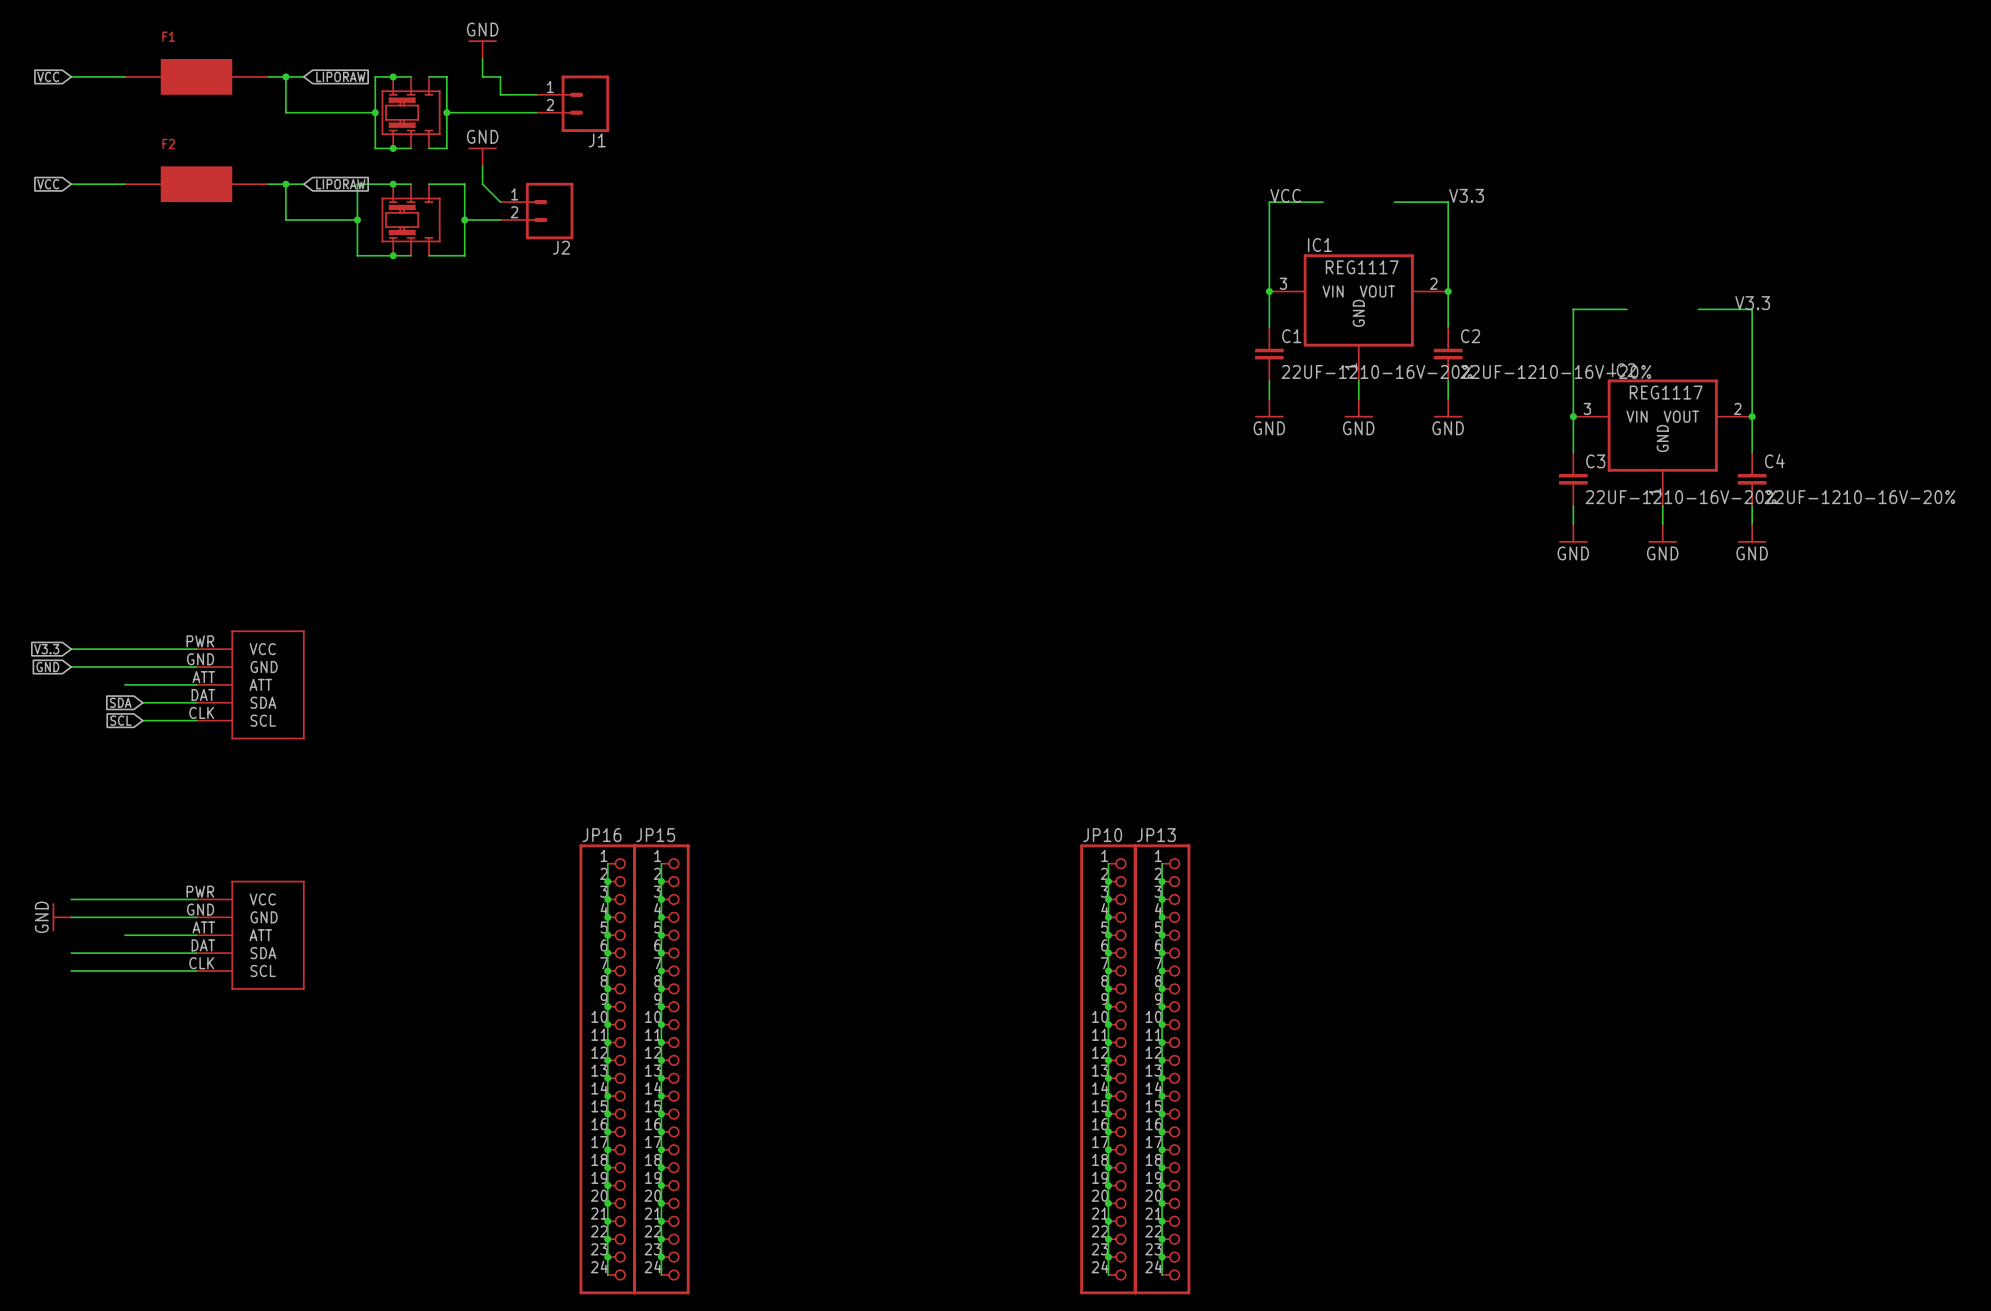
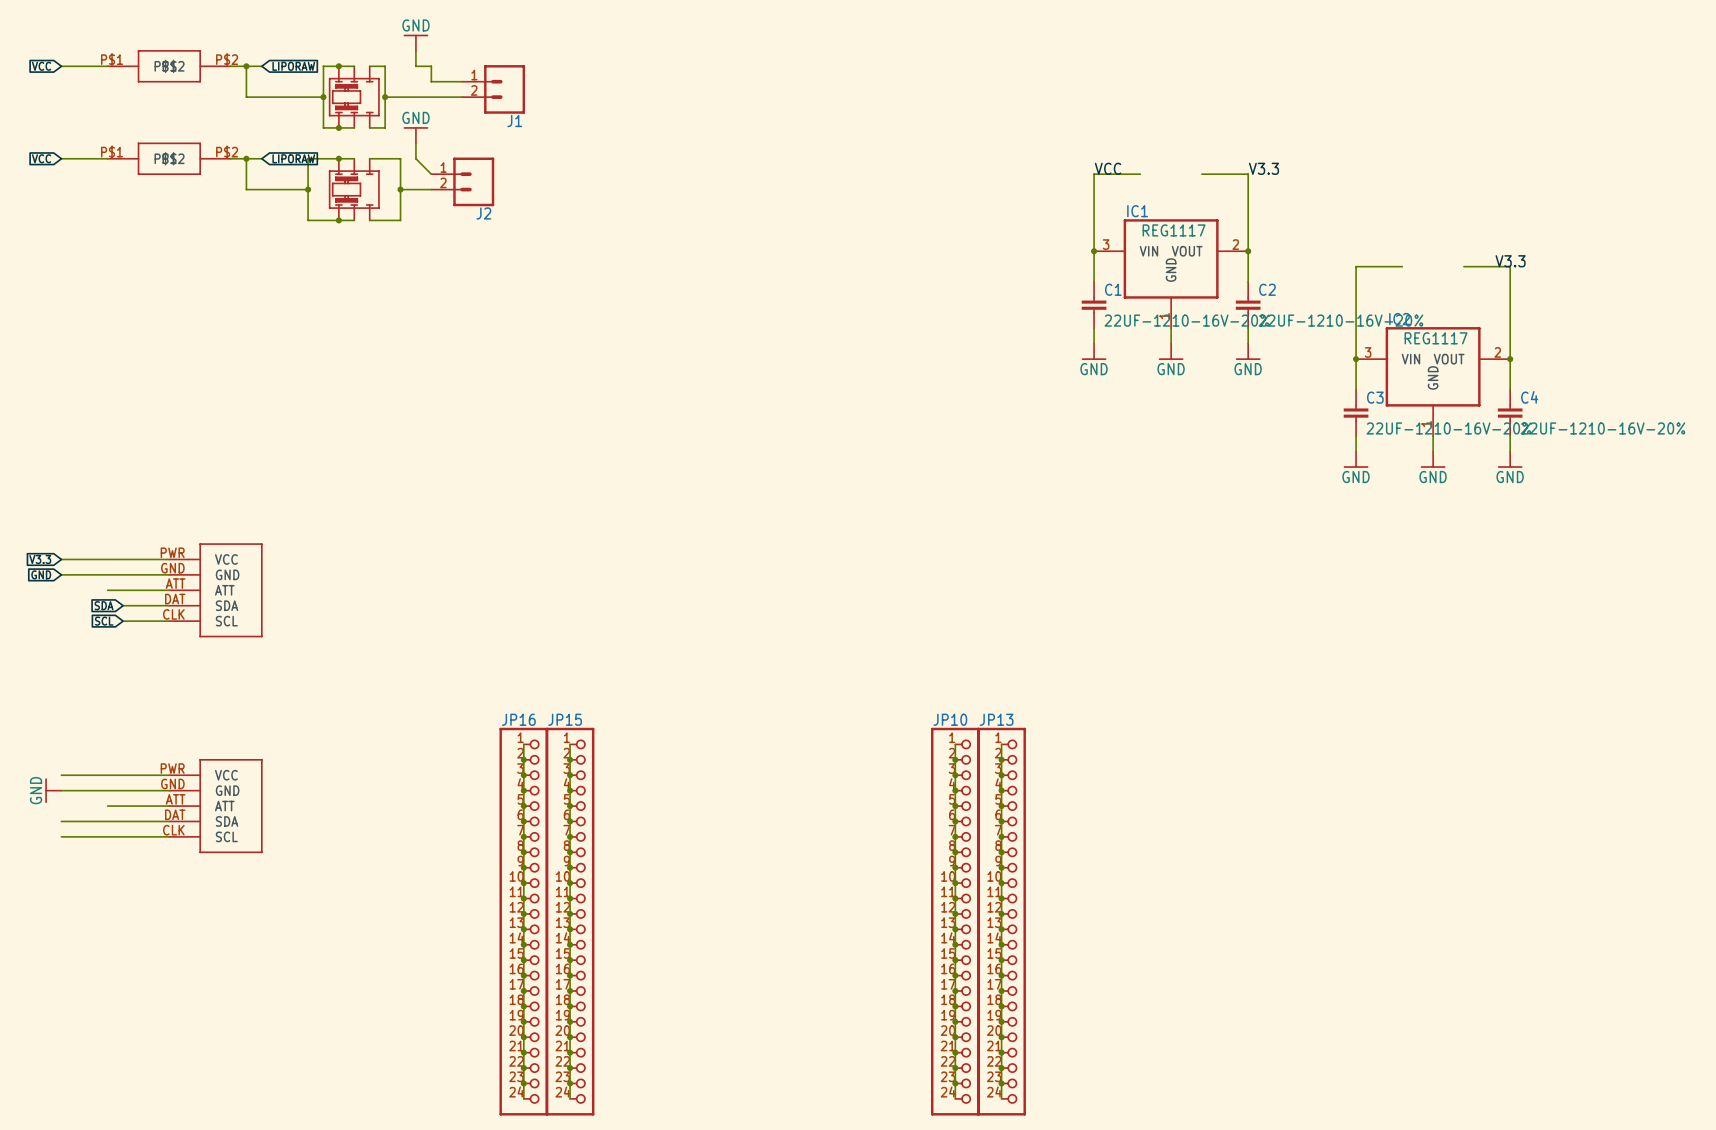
F1: (196, 76) -> none
part: none -> (169, 66)
F2: (196, 184) -> none
part: none -> (169, 158)

